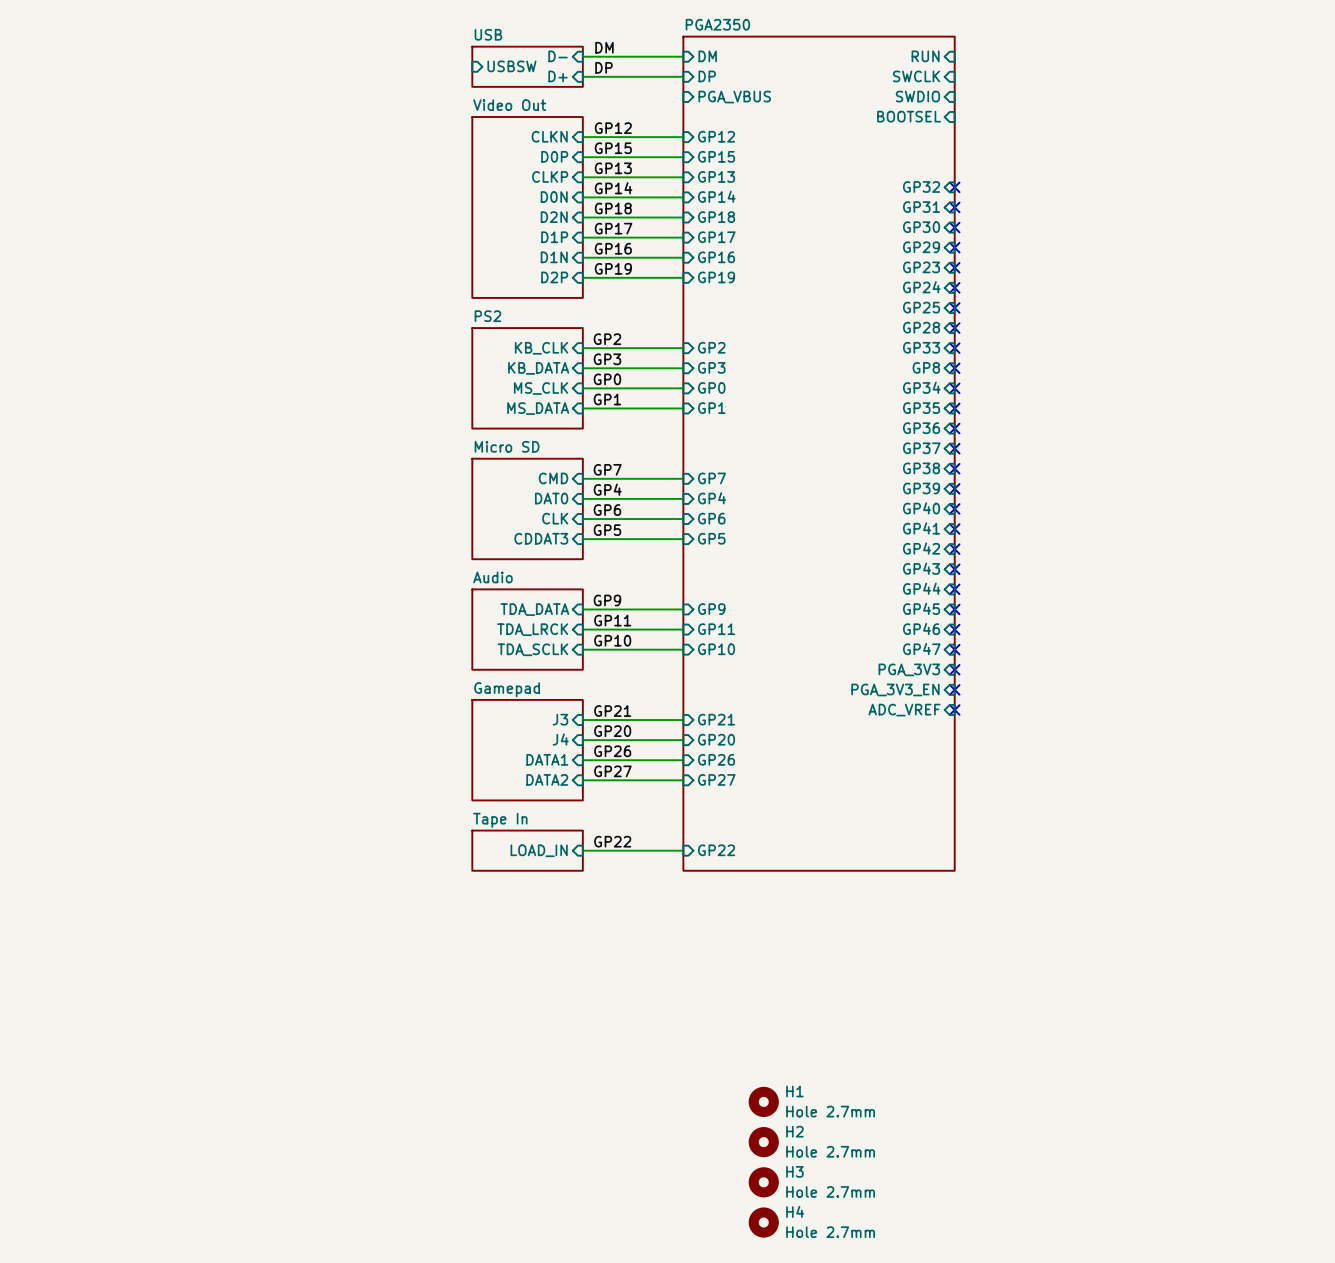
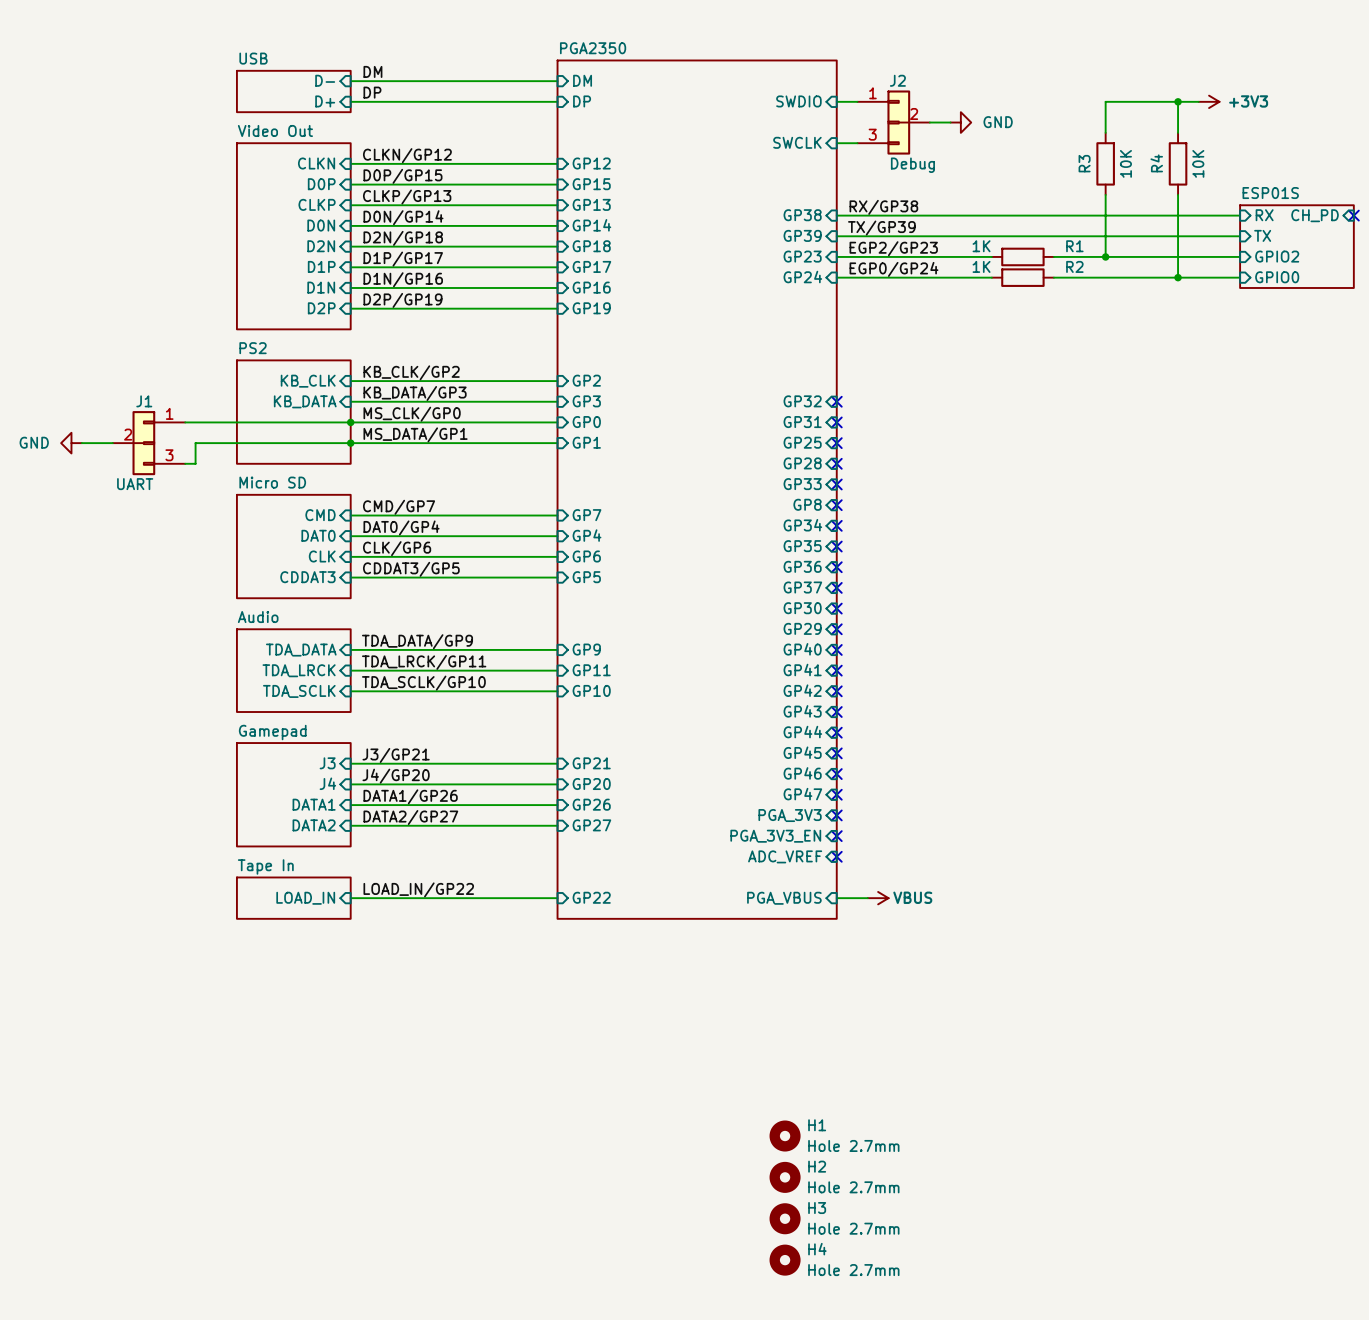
label: DM (604, 47) -> none
sheet pin: D- (558, 56) -> none
sheet pin position: DM (707, 56) -> DM (582, 80)
sheet pin: RUN (925, 56) -> none
sheet pin: USBSW (511, 66) -> none
sheet USB: (527, 66) -> none
label: none -> DM (372, 71)
label: DP (603, 67) -> none
sheet pin: none -> D- (325, 80)
wire: none -> (350, 81) (557, 81)
sheet pin: D+ (558, 76) -> none
wire: (582, 76) (683, 76) -> none
sheet pin position: DP (707, 76) -> DP (582, 101)
sheet pin position: SWCLK (916, 76) -> SWCLK (797, 142)
sheet USB: none -> (293, 91)
label: none -> DP (372, 92)
sheet pin: none -> D+ (325, 101)
wire: none -> (350, 101) (557, 101)
wire: none -> (836, 101) (857, 101)
sheet pin position: SWDIO (917, 96) -> SWDIO (798, 101)
wire: none -> (1178, 101) (1178, 132)
junction: none -> (1178, 101)
wire: none -> (1198, 101) (1105, 101) (1105, 132)
power symbol: none -> +3V3 (1209, 101)
sheet pin: PGA_VBUS (734, 97) -> none
sheet pin: BOOTSEL (909, 116) -> none
J2: none -> Debug (893, 122)
wire: none -> (929, 122) (950, 122)
power symbol: none -> GND (960, 122)
label: GP12 (613, 128) -> none
sheet pin: CLKN (549, 136) -> none
sheet pin position: GP12 (716, 136) -> GP12 (591, 163)
wire: (582, 137) (683, 137) -> none
wire: none -> (836, 143) (857, 143)
label: GP15 (613, 148) -> none
label: none -> CLKN/GP12 (407, 155)
sheet pin: none -> CLKN (316, 163)
sheet pin: D0P (554, 156) -> none
sheet pin position: GP15 (716, 156) -> GP15 (591, 184)
wire: none -> (350, 163) (557, 163)
wire: (582, 157) (683, 157) -> none
R3: none -> 10K (1105, 163)
R4: none -> 10K (1178, 163)
label: GP13 (613, 168) -> none
label: none -> D0P/GP15 (402, 176)
sheet pin: none -> D0P (321, 184)
sheet pin: CLKP (550, 176) -> none
sheet pin position: GP13 (716, 176) -> GP13 (591, 204)
wire: none -> (350, 184) (557, 184)
wire: (582, 177) (683, 177) -> none
sheet pin: GP32 (921, 186) -> none
no-connect mark: (954, 187) -> none
wire: none -> (1105, 194) (1105, 256)
wire: none -> (1178, 194) (1178, 277)
label: GP14 (613, 188) -> none
label: none -> CLKP/GP13 (407, 197)
sheet pin position: GP14 (716, 196) -> GP14 (591, 225)
sheet pin: none -> CLKP (317, 204)
wire: none -> (350, 205) (557, 205)
sheet pin: D0N (554, 197) -> none
wire: (582, 197) (683, 197) -> none
label: none -> RX/GP38 (883, 207)
sheet Video Out: (527, 207) -> none
sheet pin: none -> GP38 (802, 215)
wire: none -> (836, 215) (1240, 215)
sheet pin: GP31 (921, 207) -> none
no-connect mark: (954, 207) -> none
sheet pin: none -> RX (1264, 215)
sheet pin: none -> CH_PD (1315, 215)
no-connect mark: none -> (1353, 215)
label: GP18 (613, 208) -> none
label: none -> D0N/GP14 (403, 217)
sheet pin: none -> D0N (321, 225)
wire: none -> (350, 225) (557, 225)
sheet pin: D2N (554, 217) -> none
wire: (582, 217) (683, 217) -> none
sheet pin position: GP18 (716, 217) -> GP18 (591, 246)
label: none -> TX/GP39 (881, 228)
sheet Video Out: none -> (293, 236)
sheet pin: none -> GP39 (802, 235)
wire: none -> (836, 236) (1240, 236)
sheet pin: GP30 (921, 227) -> none
no-connect mark: (954, 227) -> none
sheet pin: none -> TX (1262, 235)
label: GP17 (613, 228) -> none
label: none -> D2N/GP18 (403, 238)
sheet pin: none -> D2N (321, 246)
wire: none -> (350, 246) (557, 246)
sheet pin: D1P (554, 237) -> none
wire: (582, 237) (683, 237) -> none
sheet pin position: GP17 (716, 237) -> GP17 (591, 266)
sheet ESP01S: none -> (1296, 246)
label: none -> EGP2/GP23 (893, 248)
wire: none -> (836, 256) (991, 256)
sheet pin: GP29 (921, 247) -> none
no-connect mark: (954, 247) -> none
R1: none -> 1K (1022, 256)
wire: none -> (1053, 256) (1240, 256)
junction: none -> (1105, 256)
sheet pin: none -> GPIO2 (1277, 256)
label: GP16 (613, 248) -> none
label: none -> D1P/GP17 (403, 259)
sheet pin: none -> D1P (321, 266)
wire: none -> (350, 267) (557, 267)
sheet pin: D1N (554, 257) -> none
wire: (582, 257) (683, 257) -> none
sheet pin position: GP16 (716, 257) -> GP16 (591, 287)
label: none -> EGP0/GP24 (893, 269)
wire: none -> (836, 277) (991, 277)
sheet pin position: GP23 (921, 267) -> GP23 (802, 256)
no-connect mark: (954, 267) -> none
R2: none -> 1K (1022, 277)
wire: none -> (1053, 277) (1240, 277)
junction: none -> (1178, 277)
sheet pin: none -> GPIO0 (1277, 277)
label: GP19 (613, 268) -> none
label: none -> D1N/GP16 (403, 279)
sheet pin: none -> D1N (321, 287)
wire: none -> (350, 287) (557, 287)
sheet pin: D2P (554, 277) -> none
wire: (582, 277) (683, 277) -> none
sheet pin position: GP19 (716, 277) -> GP19 (591, 308)
sheet pin position: GP24 (921, 287) -> GP24 (802, 277)
no-connect mark: (954, 287) -> none
label: none -> D2P/GP19 (402, 300)
sheet pin: none -> D2P (321, 308)
wire: none -> (350, 308) (557, 308)
sheet pin position: GP25 (921, 307) -> GP25 (802, 442)
no-connect mark: (954, 307) -> none
sheet pin position: GP28 (921, 327) -> GP28 (802, 463)
no-connect mark: (954, 328) -> none
label: GP2 (607, 339) -> none
sheet pin position: GP2 (711, 347) -> GP2 (586, 380)
sheet pin position: GP33 (921, 347) -> GP33 (802, 484)
sheet pin: KB_CLK (541, 348) -> none
wire: (582, 348) (683, 348) -> none
no-connect mark: (954, 348) -> none
label: GP3 (607, 359) -> none
label: none -> KB_CLK/GP2 (411, 372)
sheet pin position: GP3 (711, 367) -> GP3 (586, 401)
sheet pin position: GP8 (926, 367) -> GP8 (807, 504)
sheet pin: none -> KB_CLK (308, 381)
wire: none -> (350, 381) (557, 381)
sheet pin: KB_DATA (538, 368) -> none
wire: (582, 368) (683, 368) -> none
no-connect mark: (954, 368) -> none
sheet PS2 position: (527, 378) -> (293, 412)
label: GP0 (607, 379) -> none
label: none -> KB_DATA/GP3 (415, 393)
sheet pin position: GP0 (711, 387) -> GP0 (586, 422)
sheet pin: none -> GP32 (802, 401)
sheet pin position: GP34 (921, 387) -> GP34 (802, 525)
sheet pin: none -> KB_DATA (305, 401)
wire: none -> (350, 401) (557, 401)
sheet pin: MS_CLK (541, 388) -> none
wire: (582, 388) (683, 388) -> none
no-connect mark: none -> (836, 401)
no-connect mark: (954, 388) -> none
label: GP1 (607, 399) -> none
label: none -> MS_CLK/GP0 (412, 414)
wire: none -> (185, 422) (557, 422)
junction: none -> (350, 422)
sheet pin: MS_DATA (538, 408) -> none
wire: (582, 408) (683, 408) -> none
sheet pin position: GP1 (711, 408) -> GP1 (586, 442)
sheet pin: none -> GP31 (802, 422)
no-connect mark: none -> (836, 422)
sheet pin position: GP35 (921, 408) -> GP35 (802, 546)
no-connect mark: (954, 408) -> none
label: none -> MS_DATA/GP1 (415, 434)
power symbol: none -> GND (71, 443)
wire: none -> (81, 443) (112, 443)
J1: none -> UART (149, 443)
junction: none -> (350, 443)
wire: none -> (557, 443) (195, 443) (195, 463) (185, 463)
no-connect mark: none -> (836, 443)
sheet pin position: GP36 (921, 428) -> GP36 (802, 566)
no-connect mark: (954, 428) -> none
no-connect mark: none -> (836, 463)
sheet pin position: GP37 (921, 448) -> GP37 (802, 587)
no-connect mark: (954, 448) -> none
sheet PGA2350 position: (819, 453) -> (697, 489)
no-connect mark: none -> (836, 484)
sheet pin: GP38 (921, 468) -> none
no-connect mark: (954, 468) -> none
label: GP7 (607, 469) -> none
sheet pin: CMD (553, 478) -> none
wire: (582, 478) (683, 478) -> none
sheet pin position: GP7 (711, 478) -> GP7 (587, 515)
no-connect mark: none -> (836, 505)
sheet pin: GP39 (921, 488) -> none
no-connect mark: (954, 488) -> none
label: GP4 (607, 489) -> none
label: none -> CMD/GP7 (399, 507)
sheet pin: none -> CMD (320, 515)
wire: none -> (350, 515) (557, 515)
sheet pin: DAT0 (551, 498) -> none
wire: (582, 498) (683, 498) -> none
sheet pin position: GP4 (711, 498) -> GP4 (587, 535)
sheet Micro SD: (527, 508) -> none
no-connect mark: none -> (836, 525)
sheet pin position: GP40 (921, 508) -> GP40 (802, 649)
no-connect mark: (954, 508) -> none
label: GP6 (607, 510) -> none
label: none -> DAT0/GP4 (401, 527)
sheet pin: none -> DAT0 (318, 535)
sheet pin: CLK (555, 518) -> none
sheet pin position: GP6 (711, 518) -> GP6 (586, 556)
wire: none -> (350, 536) (557, 536)
wire: (582, 519) (683, 519) -> none
sheet pin position: GP41 (921, 528) -> GP41 (802, 670)
sheet Micro SD: none -> (293, 546)
no-connect mark: none -> (836, 546)
no-connect mark: (954, 529) -> none
label: GP5 (607, 530) -> none
label: none -> CLK/GP6 (397, 548)
sheet pin: none -> CLK (322, 556)
sheet pin: CDDAT3 (541, 538) -> none
sheet pin position: GP5 (711, 538) -> GP5 (586, 577)
wire: none -> (350, 556) (557, 556)
wire: (582, 539) (683, 539) -> none
sheet pin position: GP42 (921, 548) -> GP42 (802, 690)
no-connect mark: none -> (836, 567)
no-connect mark: (954, 549) -> none
label: none -> CDDAT3/GP5 (411, 569)
sheet pin: none -> CDDAT3 (307, 577)
wire: none -> (350, 577) (557, 577)
sheet pin position: GP43 (921, 568) -> GP43 (802, 711)
no-connect mark: none -> (836, 587)
no-connect mark: (954, 569) -> none
sheet pin: none -> GP30 (802, 608)
sheet pin position: GP44 (921, 588) -> GP44 (802, 732)
no-connect mark: none -> (836, 608)
no-connect mark: (954, 589) -> none
label: GP9 (607, 600) -> none
sheet pin position: GP45 (921, 608) -> GP45 (802, 752)
sheet pin: TDA_DATA (534, 609) -> none
wire: (582, 609) (683, 609) -> none
sheet pin position: GP9 (711, 609) -> GP9 (586, 649)
sheet pin: none -> GP29 (802, 628)
no-connect mark: none -> (836, 629)
no-connect mark: (954, 609) -> none
label: GP11 (612, 620) -> none
label: none -> TDA_DATA/GP9 (417, 641)
sheet pin position: GP46 (921, 628) -> GP46 (802, 773)
sheet pin: none -> TDA_DATA (301, 650)
wire: none -> (350, 649) (557, 649)
sheet Audio: (527, 629) -> none
sheet pin: TDA_LRCK (532, 629) -> none
wire: (582, 629) (683, 629) -> none
sheet pin position: GP11 (716, 629) -> GP11 (591, 670)
no-connect mark: none -> (836, 649)
no-connect mark: (954, 629) -> none
label: GP10 (612, 640) -> none
label: none -> TDA_LRCK/GP11 (424, 662)
sheet Audio: none -> (293, 670)
sheet pin: none -> TDA_LRCK (299, 670)
wire: none -> (350, 670) (557, 670)
sheet pin: TDA_SCLK (532, 649) -> none
wire: (582, 649) (683, 649) -> none
sheet pin position: GP10 (716, 649) -> GP10 (591, 690)
no-connect mark: none -> (836, 670)
sheet pin position: GP47 (921, 649) -> GP47 (802, 794)
no-connect mark: (954, 649) -> none
label: none -> TDA_SCLK/GP10 (423, 683)
sheet pin: none -> TDA_SCLK (299, 691)
wire: none -> (350, 691) (557, 691)
no-connect mark: none -> (836, 691)
sheet pin position: PGA_3V3 (909, 669) -> PGA_3V3 (790, 815)
no-connect mark: (954, 669) -> none
no-connect mark: none -> (836, 712)
sheet pin position: PGA_3V3_EN (895, 689) -> PGA_3V3_EN (775, 836)
no-connect mark: (954, 689) -> none
no-connect mark: none -> (836, 732)
no-connect mark: (954, 709) -> none
sheet pin position: ADC_VREF (904, 710) -> ADC_VREF (785, 856)
label: GP21 (612, 711) -> none
sheet pin: J3 (560, 719) -> none
sheet pin position: GP21 (716, 719) -> GP21 (591, 763)
wire: (582, 720) (683, 720) -> none
no-connect mark: none -> (836, 753)
label: GP20 (612, 731) -> none
label: none -> J3/GP21 (396, 755)
sheet pin: none -> J3 (327, 763)
sheet pin: J4 (560, 739) -> none
sheet pin position: GP20 (716, 739) -> GP20 (591, 784)
wire: none -> (350, 763) (557, 763)
wire: (582, 740) (683, 740) -> none
sheet Gamepad: (527, 750) -> none
no-connect mark: none -> (836, 774)
label: GP26 (612, 751) -> none
label: none -> J4/GP20 (396, 776)
sheet pin: none -> J4 (327, 783)
sheet pin: DATA1 (547, 759) -> none
sheet pin position: GP26 (716, 759) -> GP26 (591, 804)
wire: none -> (350, 784) (557, 784)
wire: (582, 760) (683, 760) -> none
sheet Gamepad: none -> (293, 794)
no-connect mark: none -> (836, 794)
label: GP27 (612, 771) -> none
label: none -> DATA1/GP26 (410, 796)
sheet pin: none -> DATA1 (314, 804)
sheet pin: DATA2 (547, 779) -> none
sheet pin position: GP27 (716, 779) -> GP27 (591, 825)
wire: none -> (350, 805) (557, 805)
wire: (582, 780) (683, 780) -> none
no-connect mark: none -> (836, 815)
label: none -> DATA2/GP27 (410, 817)
sheet pin: none -> DATA2 (314, 825)
wire: none -> (350, 825) (557, 825)
no-connect mark: none -> (836, 836)
no-connect mark: none -> (836, 856)
label: GP22 (612, 841) -> none
sheet Tape In: (527, 850) -> none
sheet pin: LOAD_IN (539, 850) -> none
wire: (582, 850) (683, 850) -> none
sheet pin position: GP22 (716, 850) -> GP22 (591, 897)
label: none -> LOAD_IN/GP22 (418, 889)
sheet Tape In: none -> (293, 898)
sheet pin: none -> LOAD_IN (305, 898)
wire: none -> (350, 898) (557, 898)
sheet pin: none -> PGA_VBUS (784, 898)
power symbol: none -> VBUS (878, 898)

